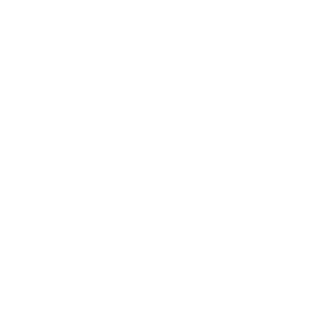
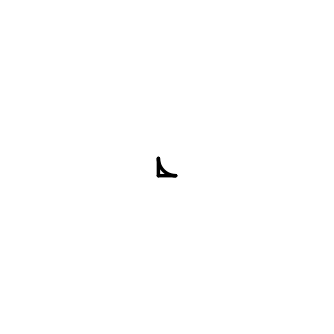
board edge: none -> (158, 158) (158, 175) (175, 175) (163, 170) (158, 158)

